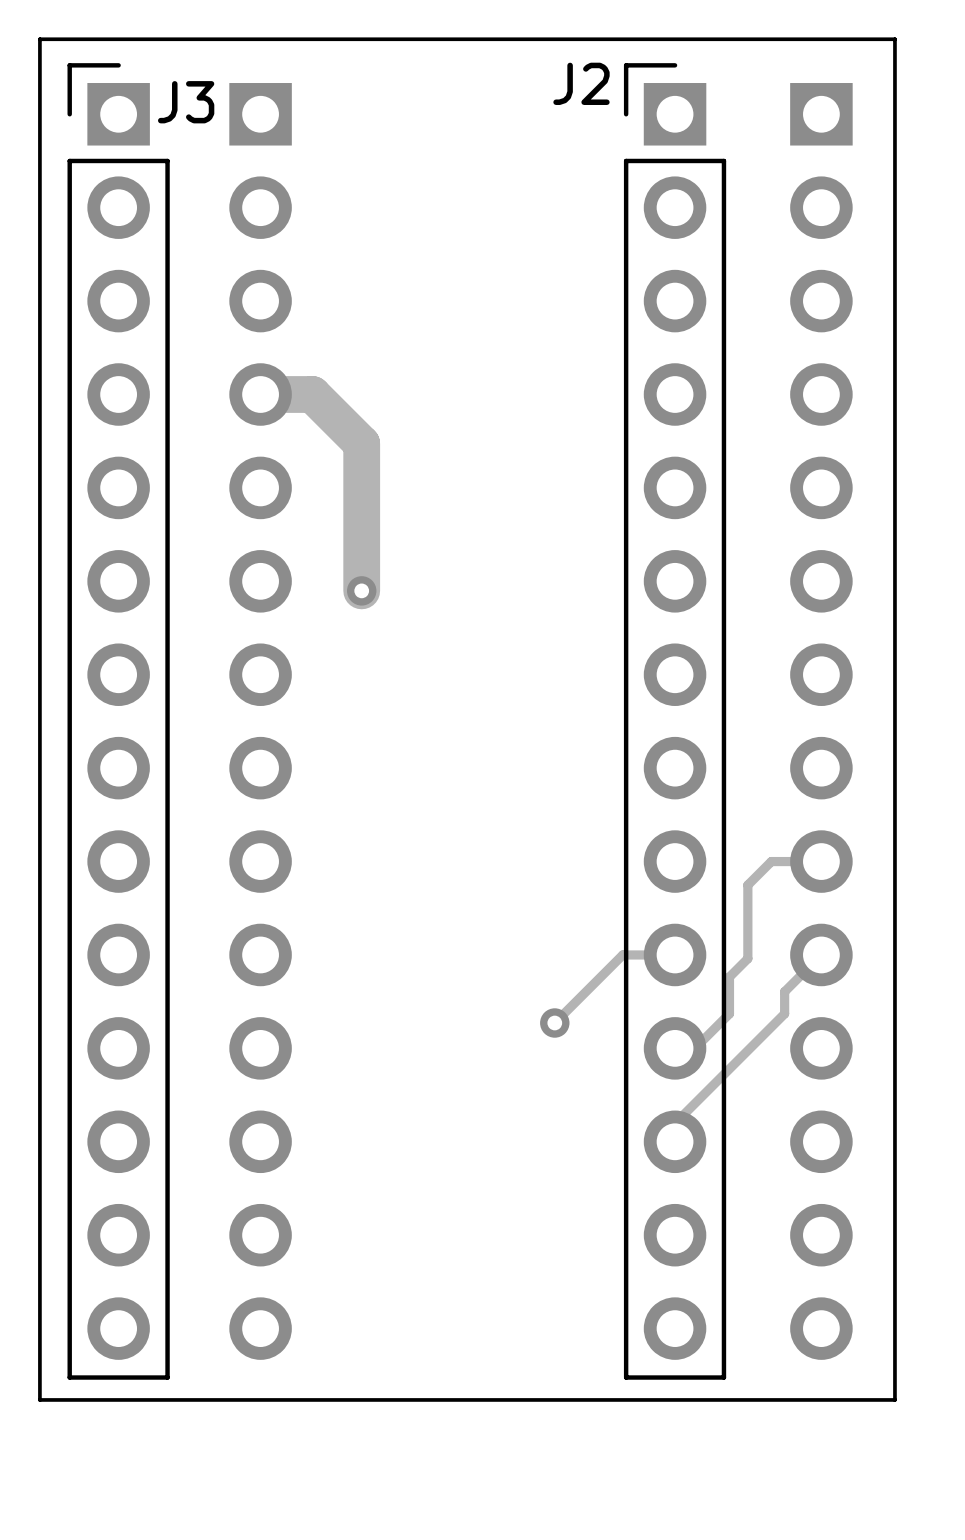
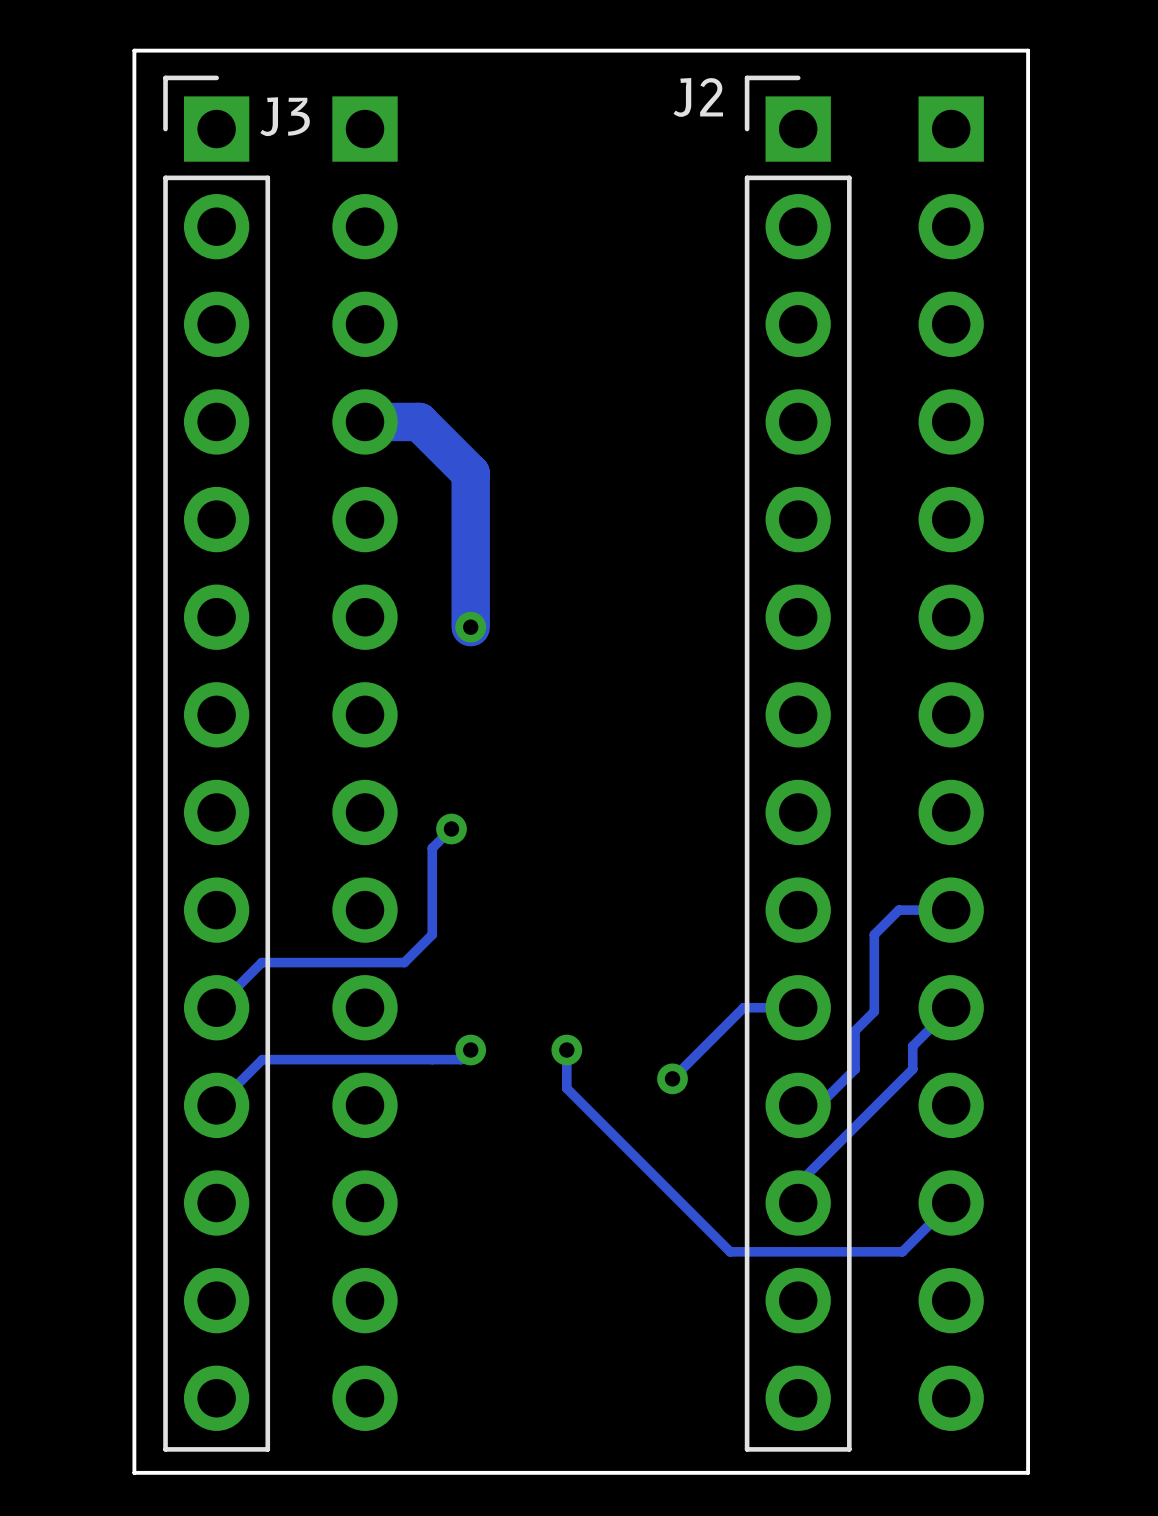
track: none -> (451, 829) (432, 848) (432, 934) (404, 962) (261, 962) (216, 1007)
via: none -> (451, 829)
track: none -> (470, 1050) (461, 1059) (262, 1059) (216, 1105)
via: none -> (470, 1050)
track: none -> (566, 1050) (566, 1088) (730, 1251) (902, 1251) (951, 1203)
via: none -> (566, 1050)

